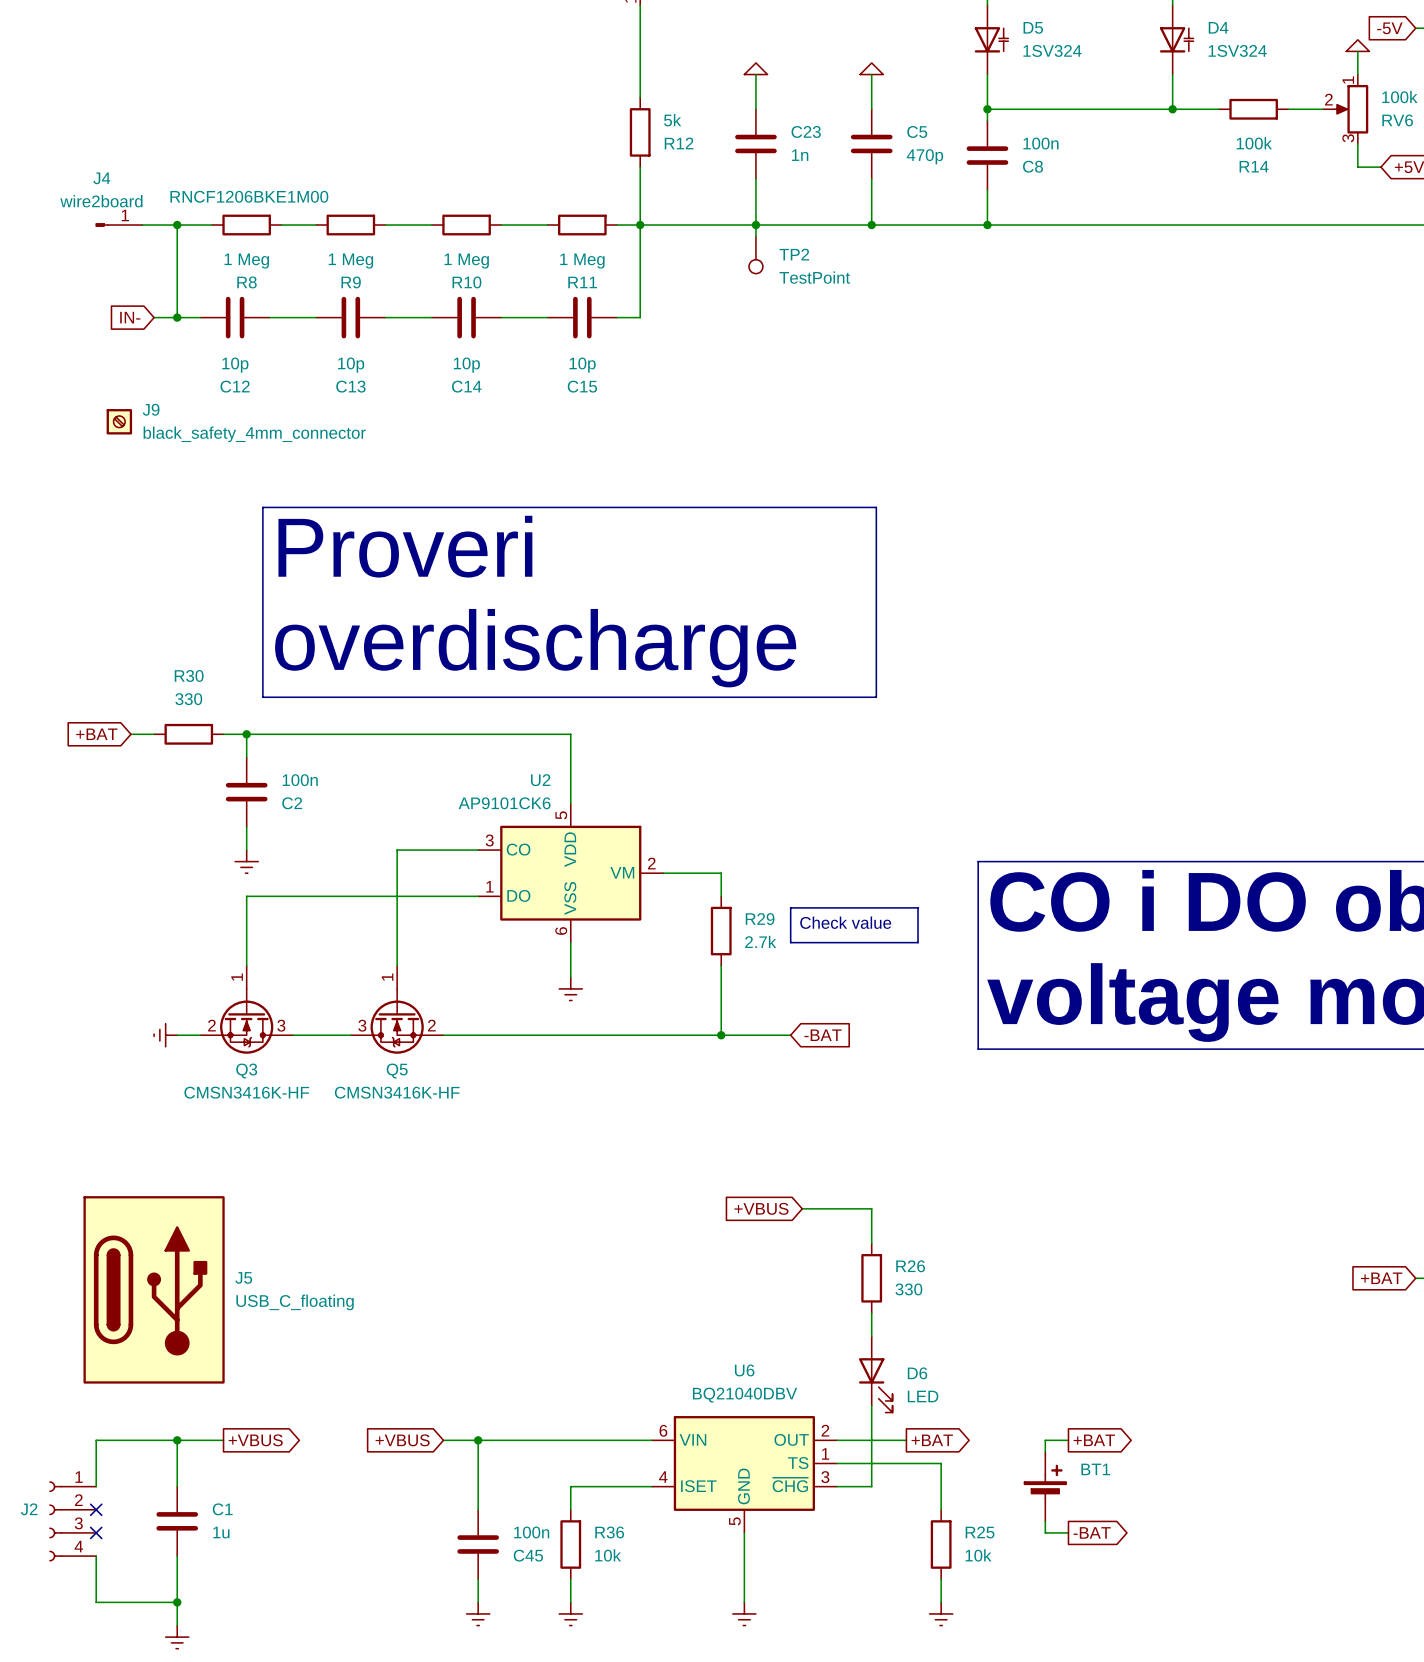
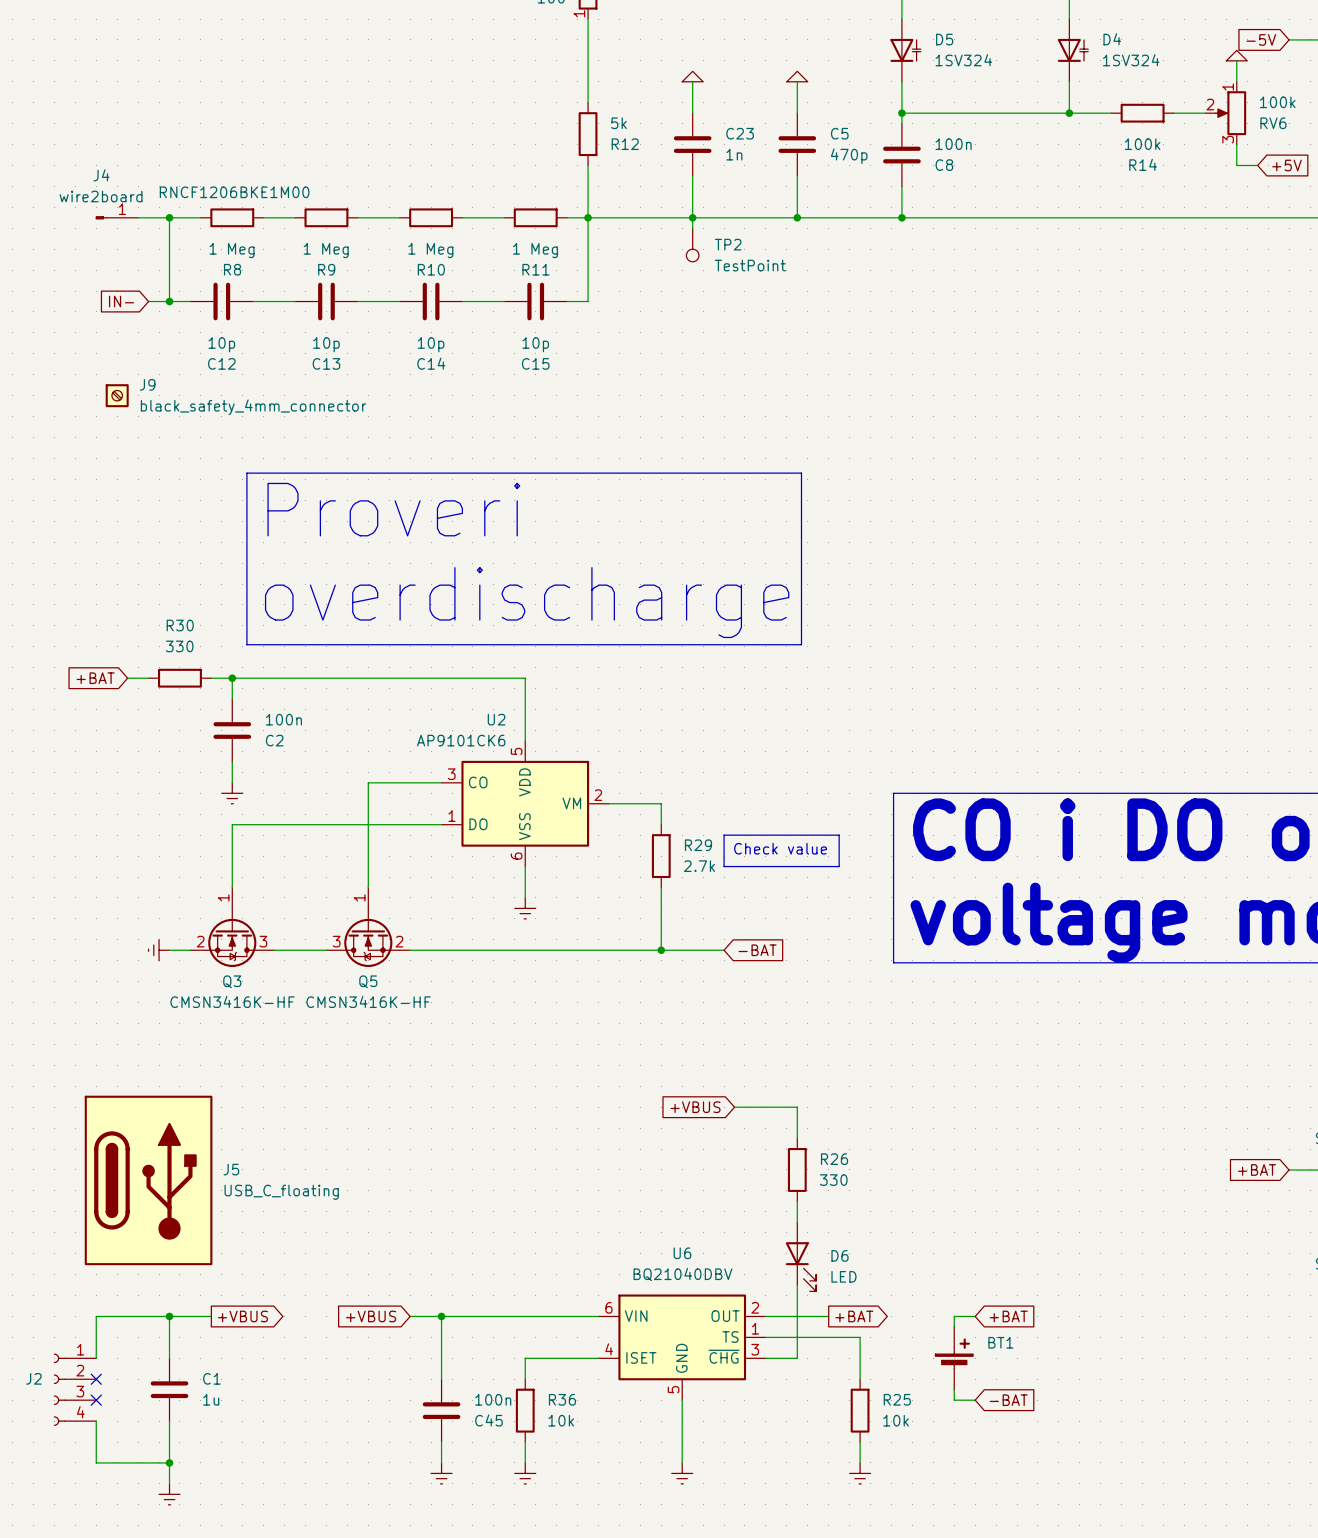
global label shape: output (1094, 1440) -> input (1008, 1316)
global label shape: output (1092, 1532) -> input (1008, 1400)

